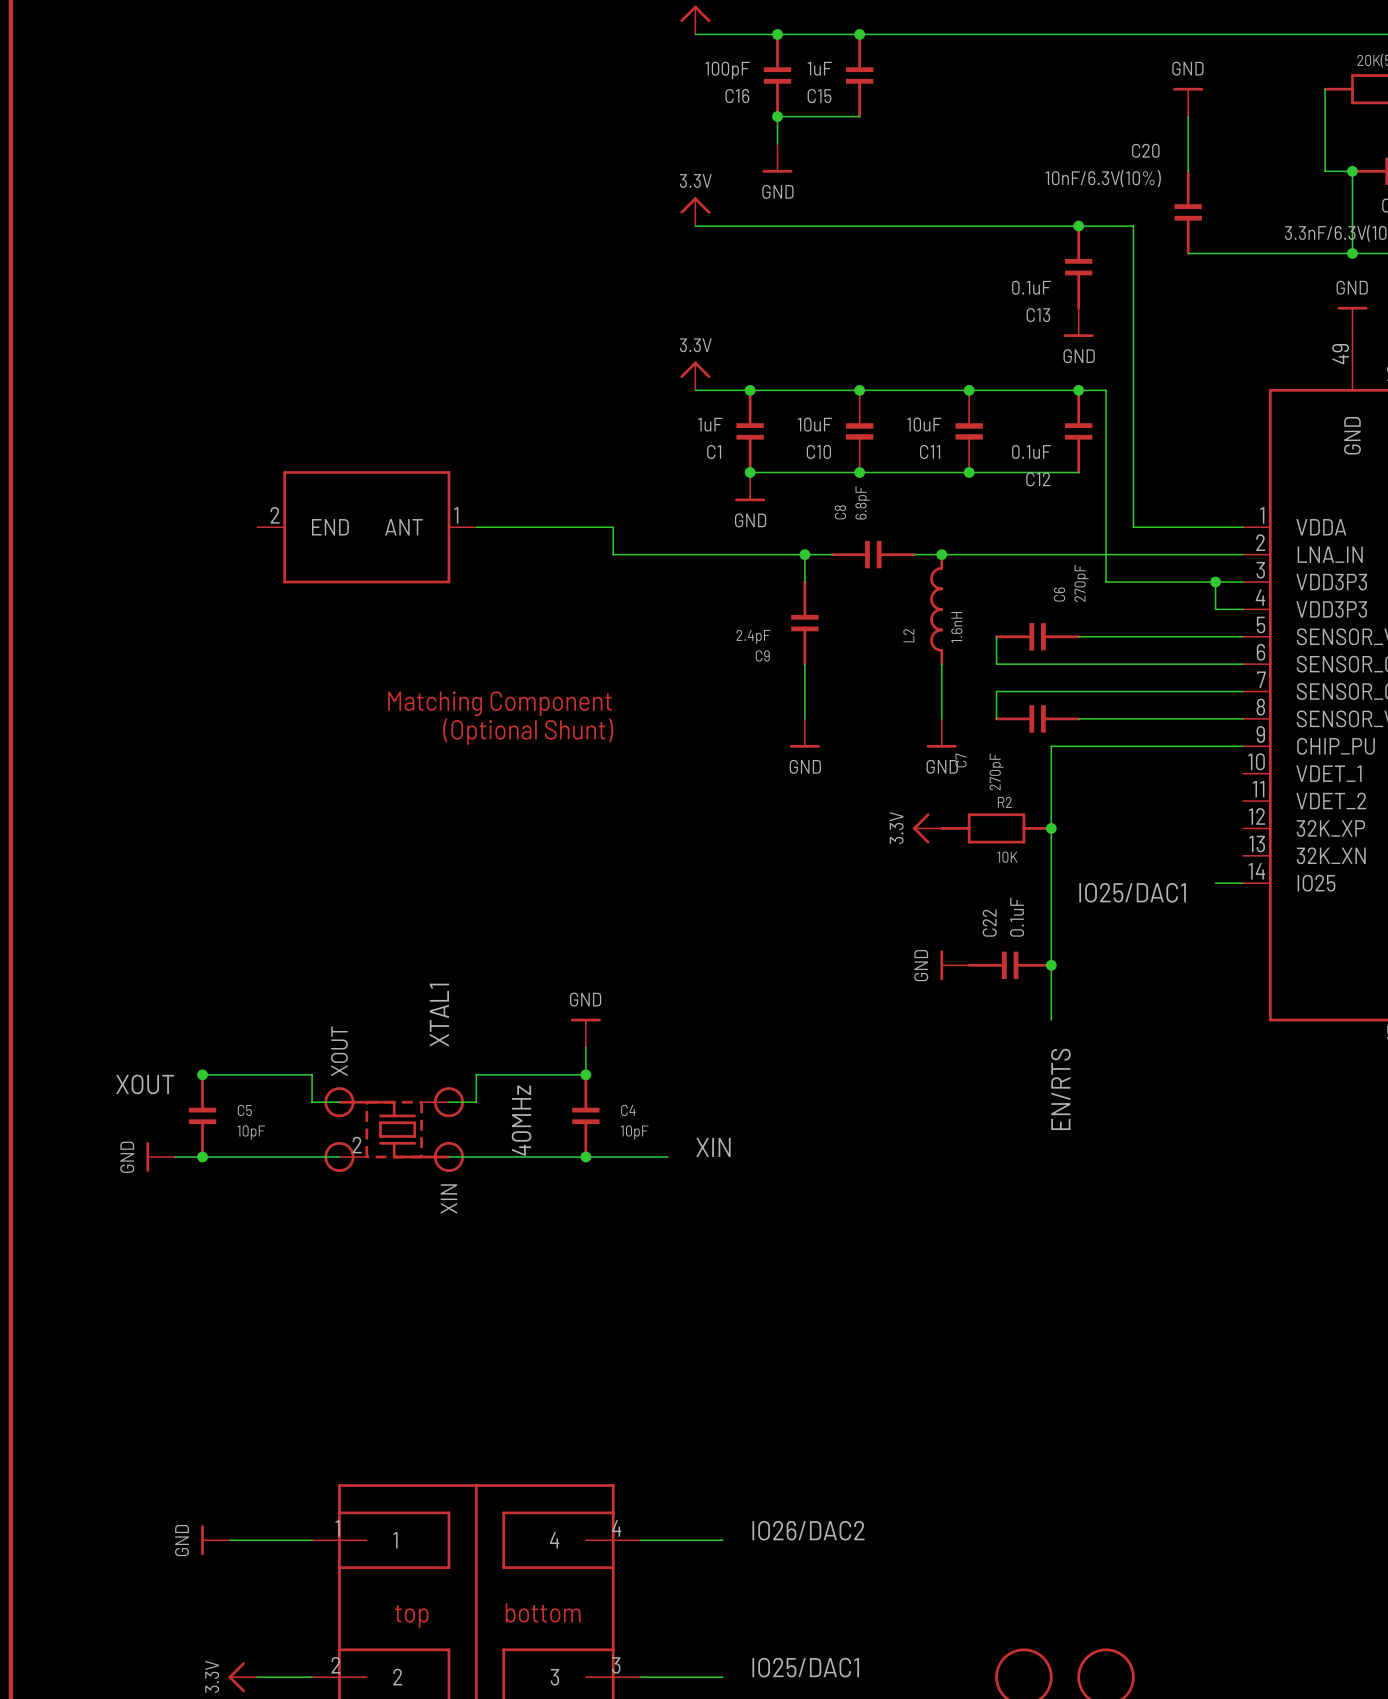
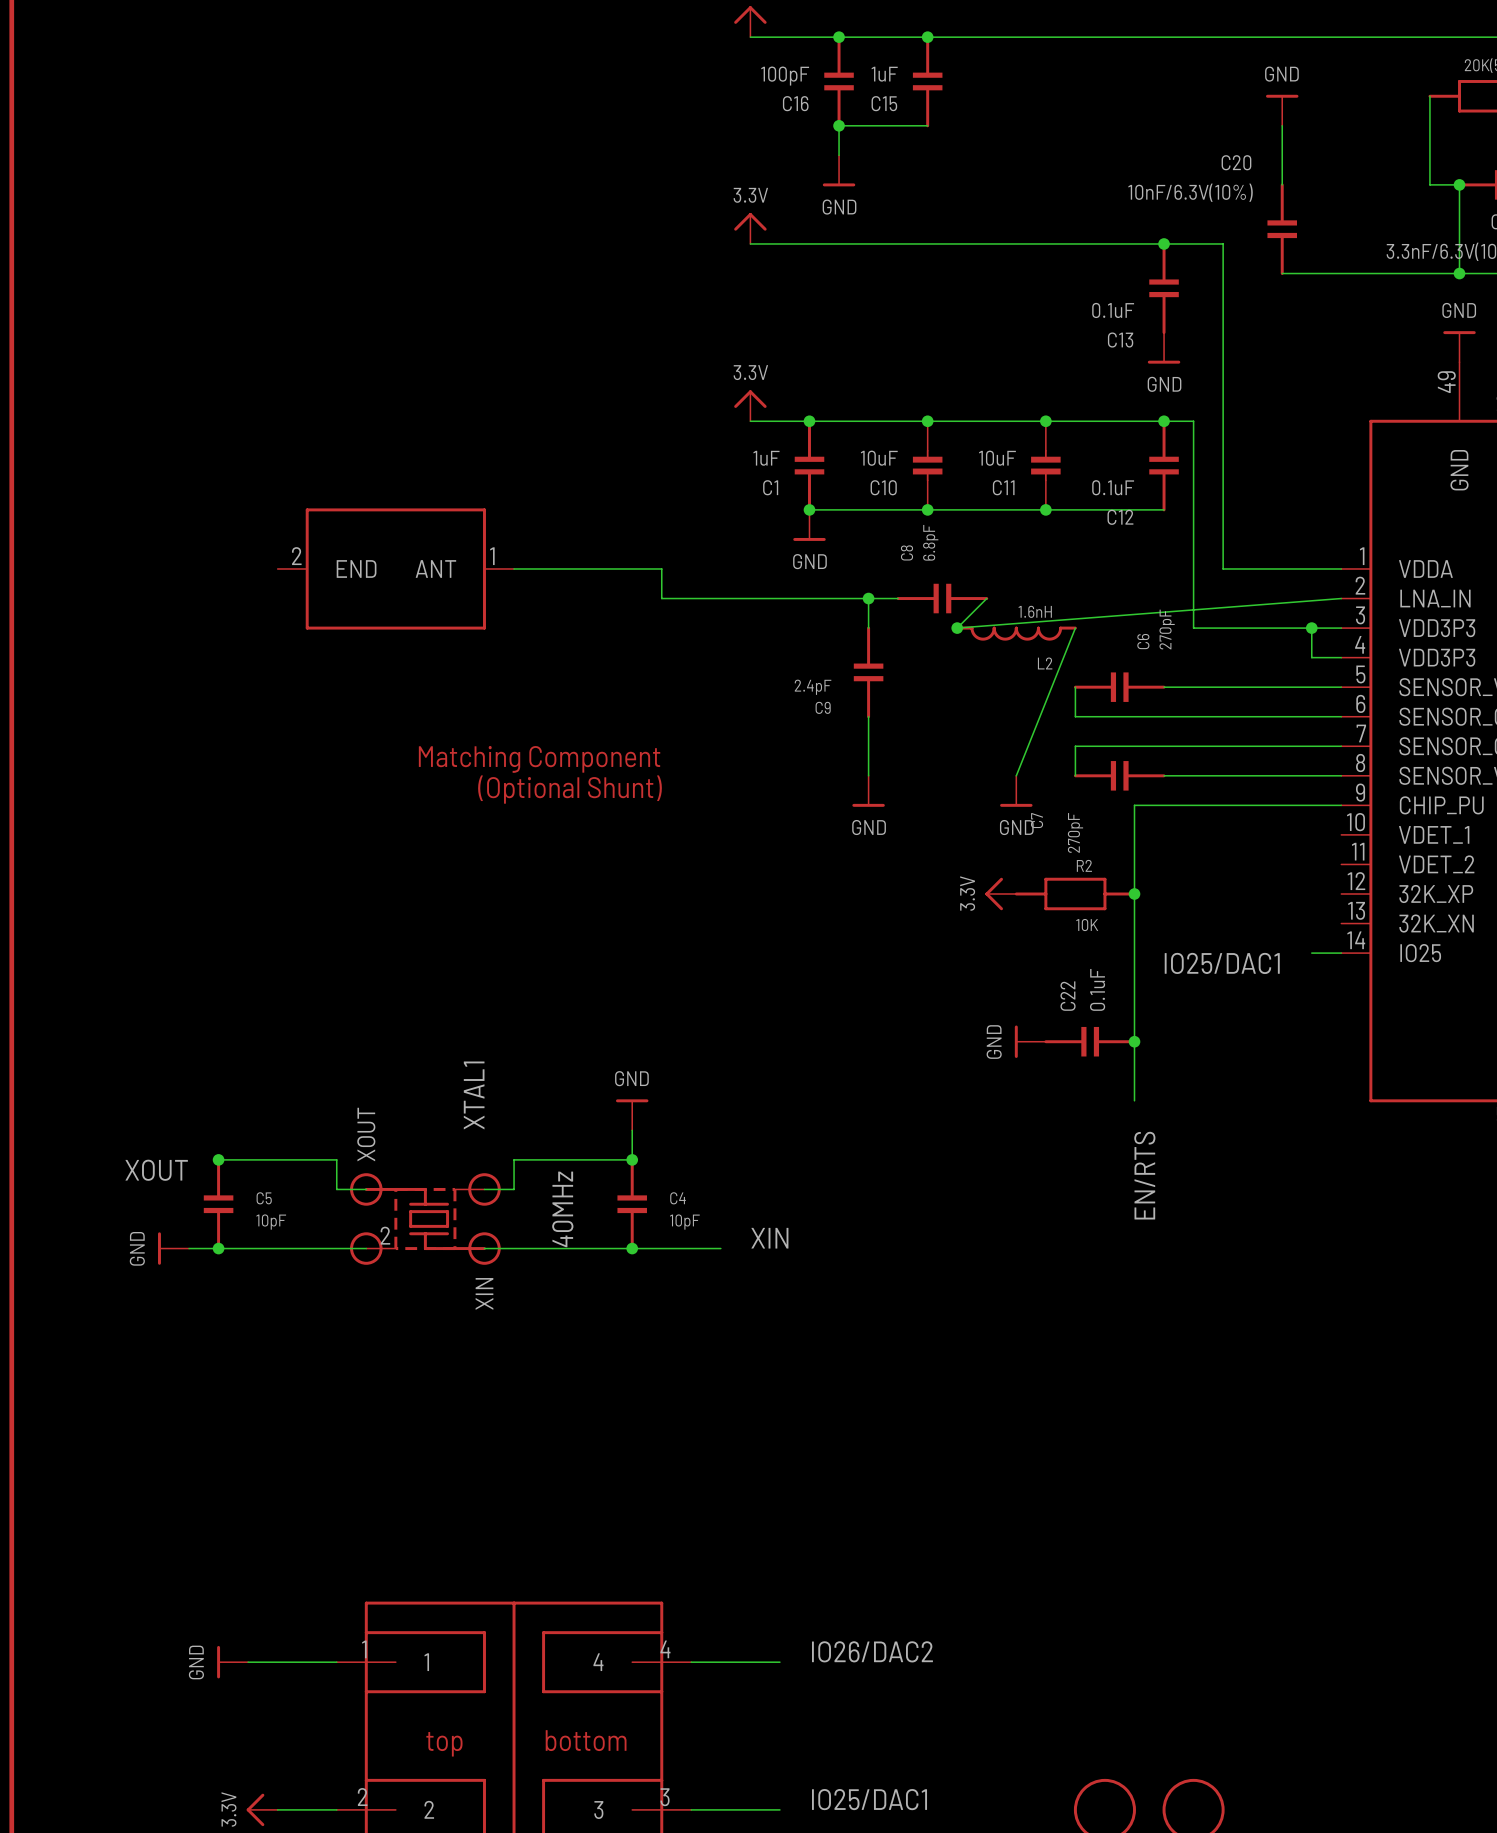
wire: (914, 554) (1242, 554) -> (986, 598) (957, 628) (1341, 598)
junction position: (941, 554) -> (957, 628)
L2 rotation: 0° (936, 609) -> 90° counterclockwise (1016, 633)
wire: (941, 664) (941, 718) -> (1075, 628) (1016, 775)

